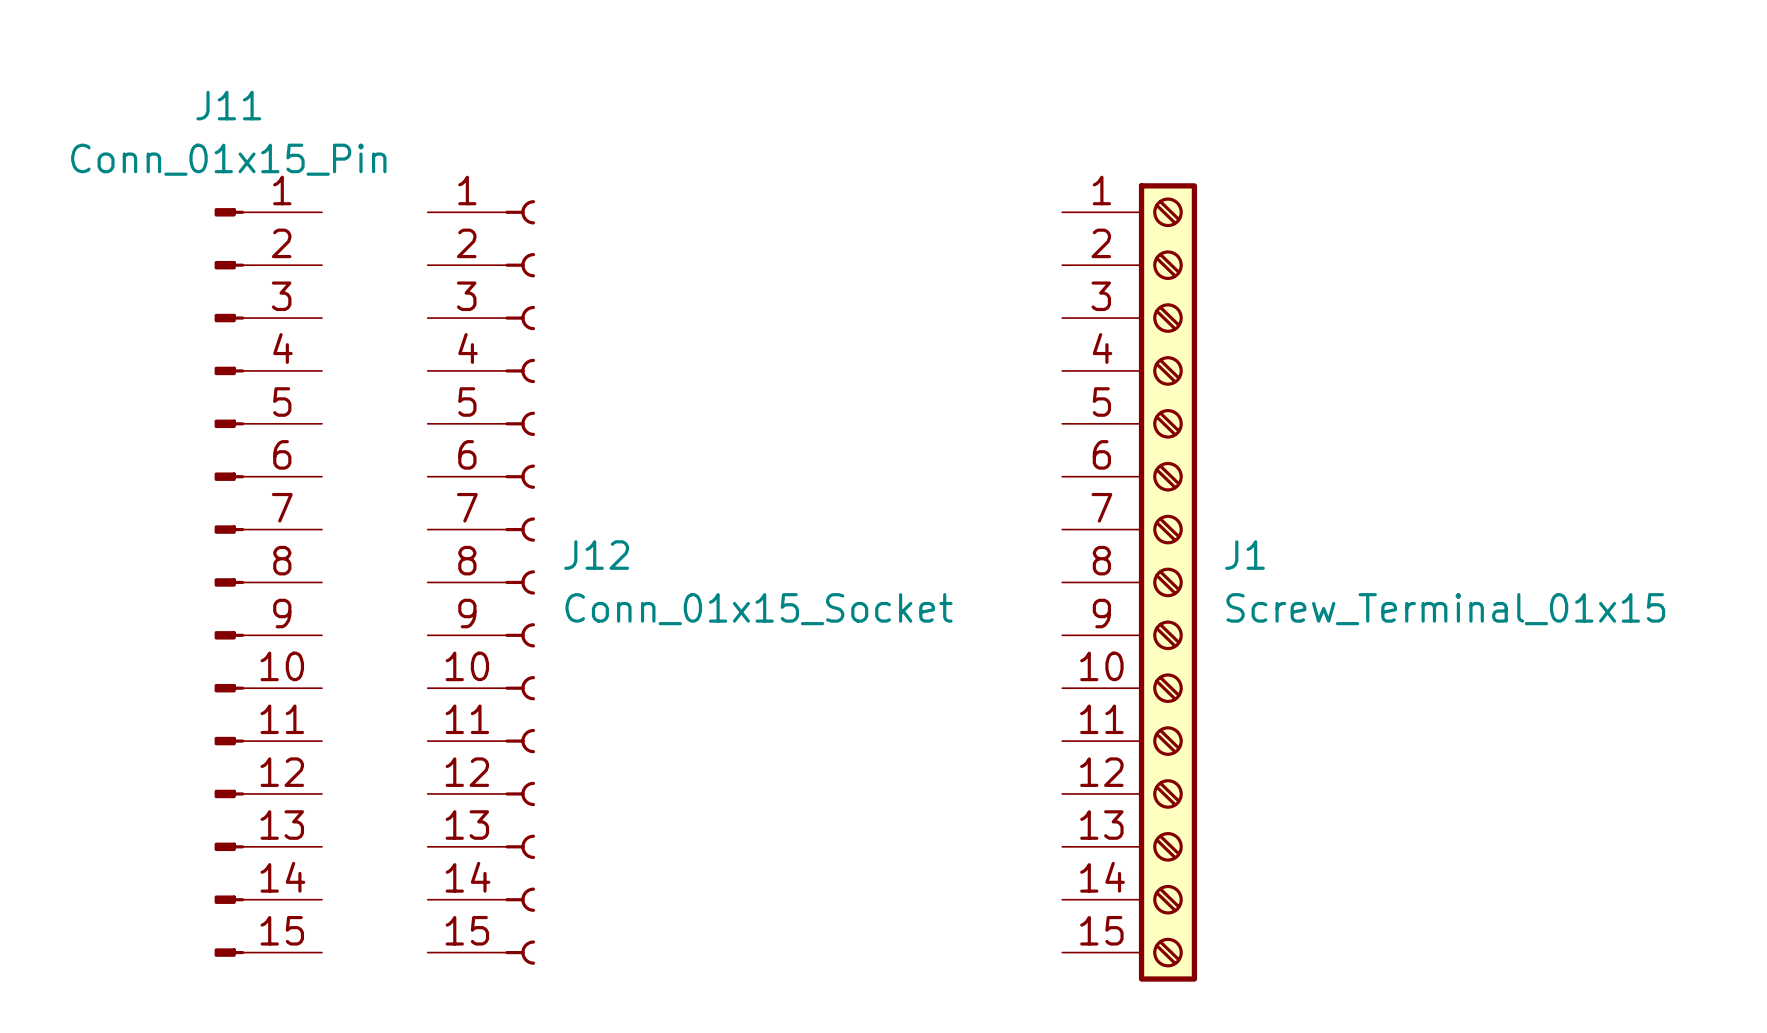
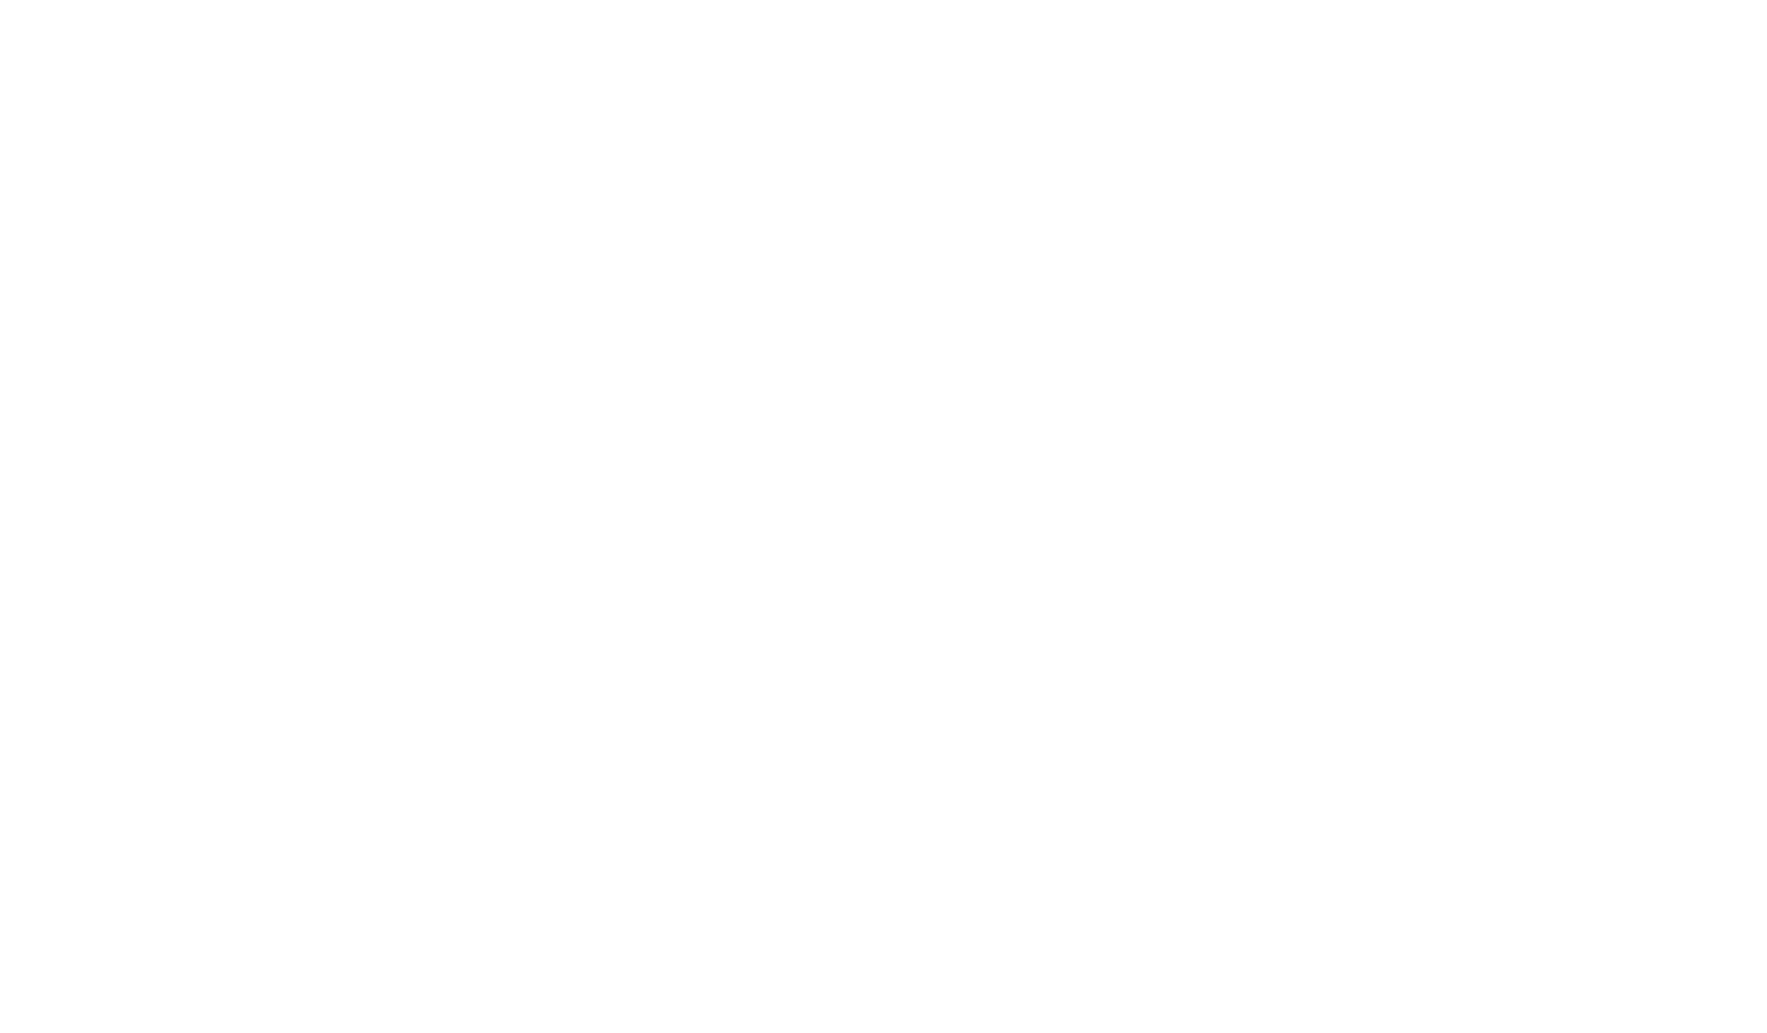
J11: Conn_01x15_Pin (268, 582) -> none
J12: Conn_01x15_Socket (481, 582) -> none
J1: Screw_Terminal_01x15 (1129, 582) -> none

